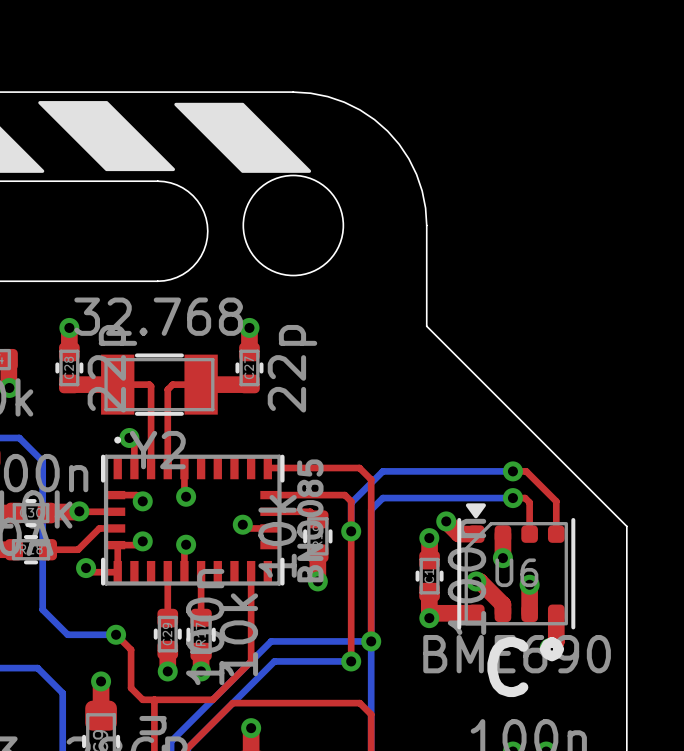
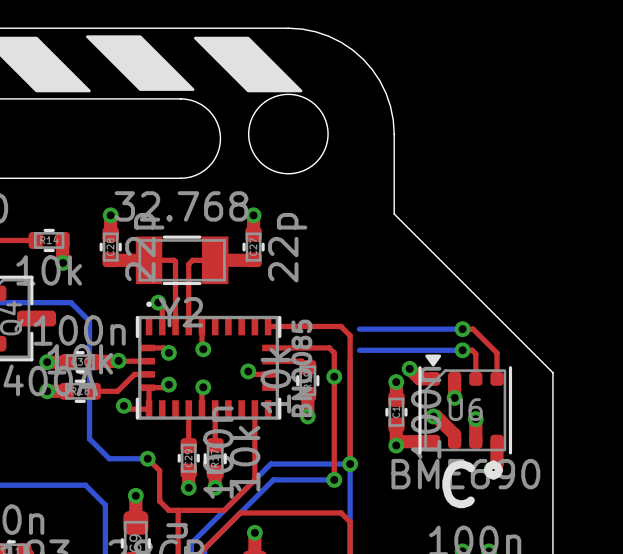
bottom track: (382, 471) (351, 503) (351, 531) -> none
bottom track: (382, 498) (371, 509) -> none

